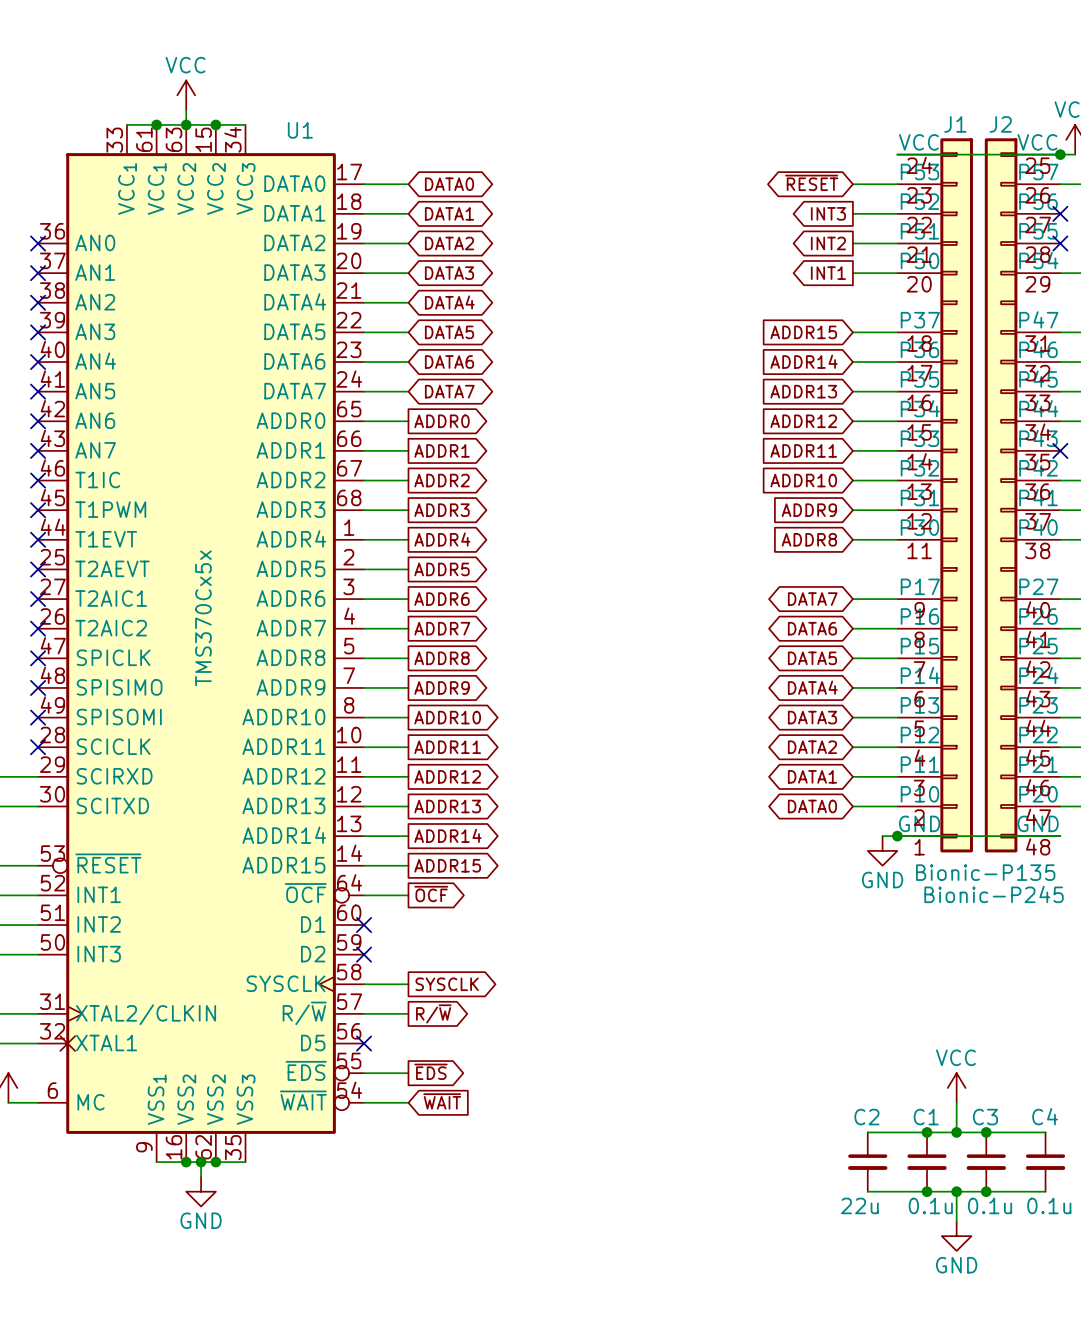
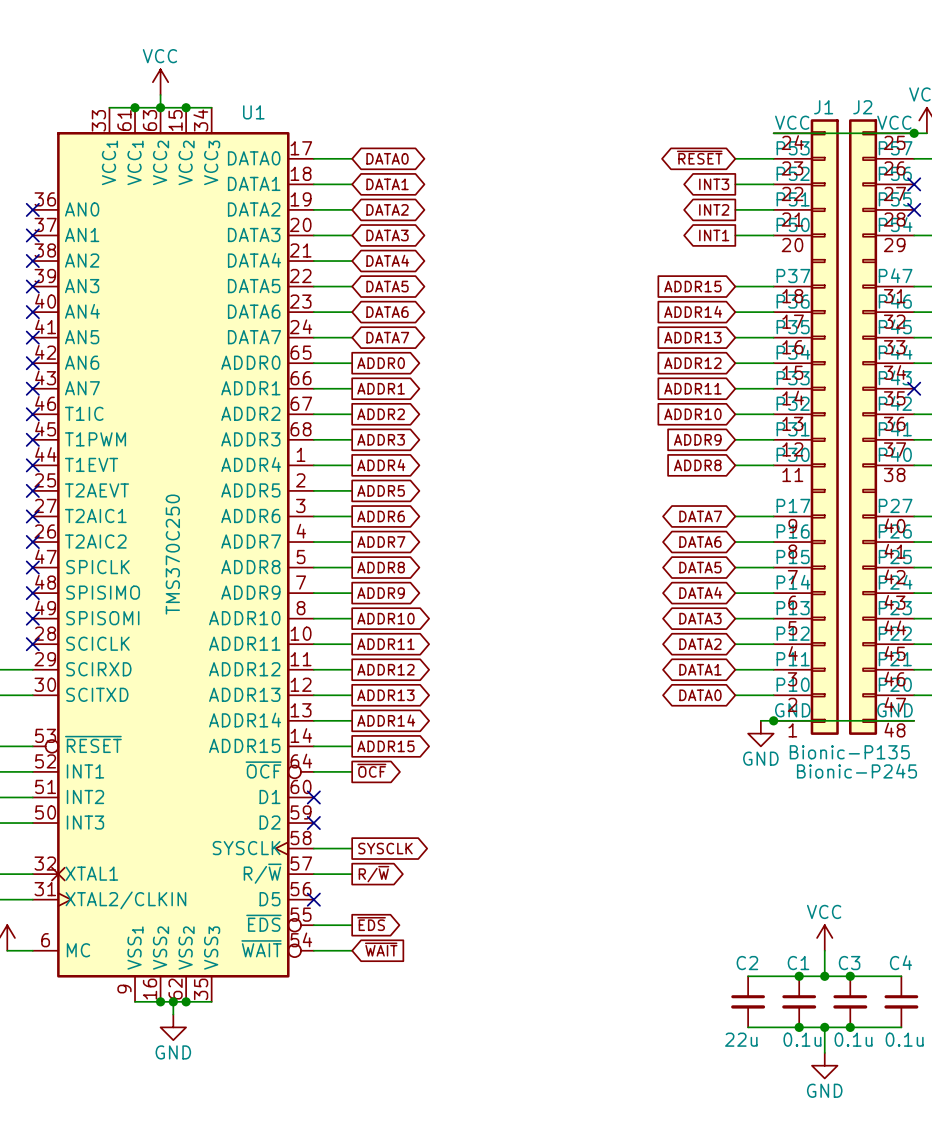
U1 symbol: [38, 124, 365, 1163] -> [32, 107, 314, 1002]
U1 value: TMS370Cx5x (203, 618) -> TMS370C250 (172, 554)

